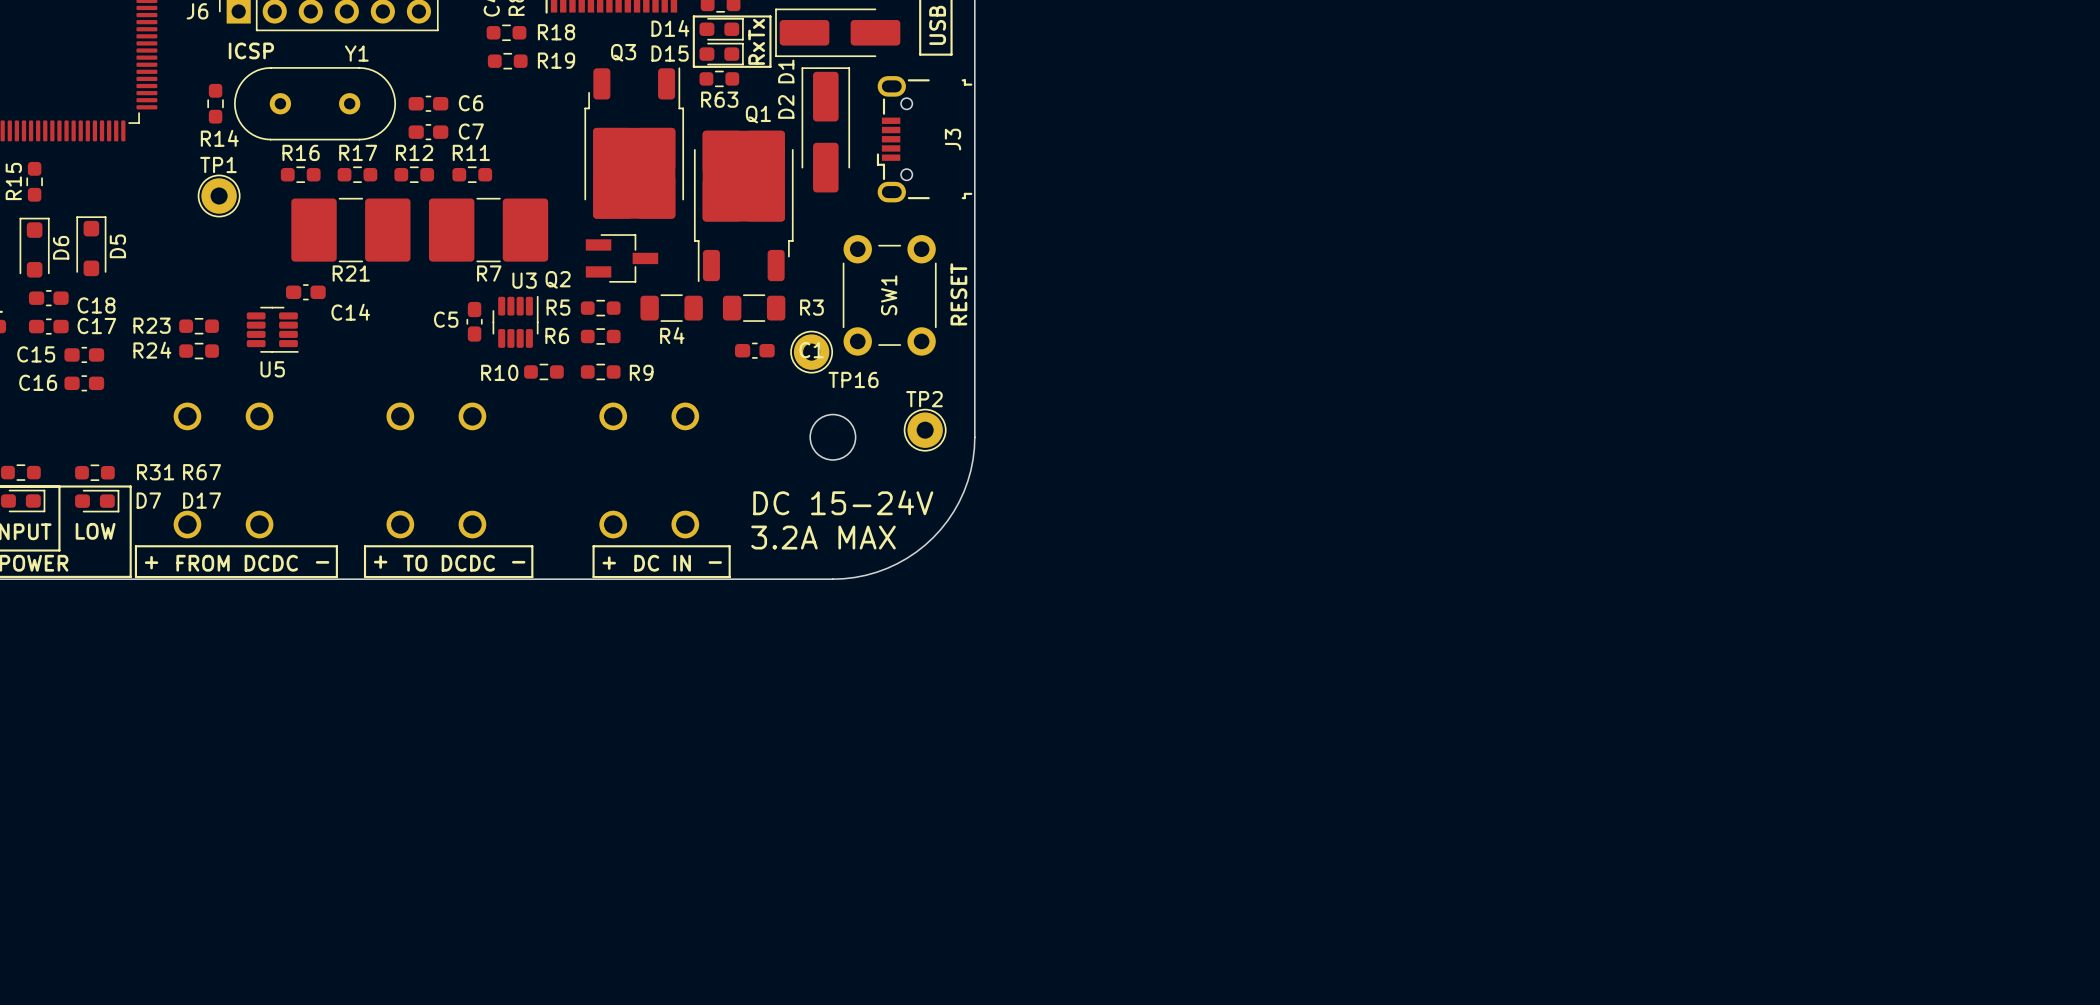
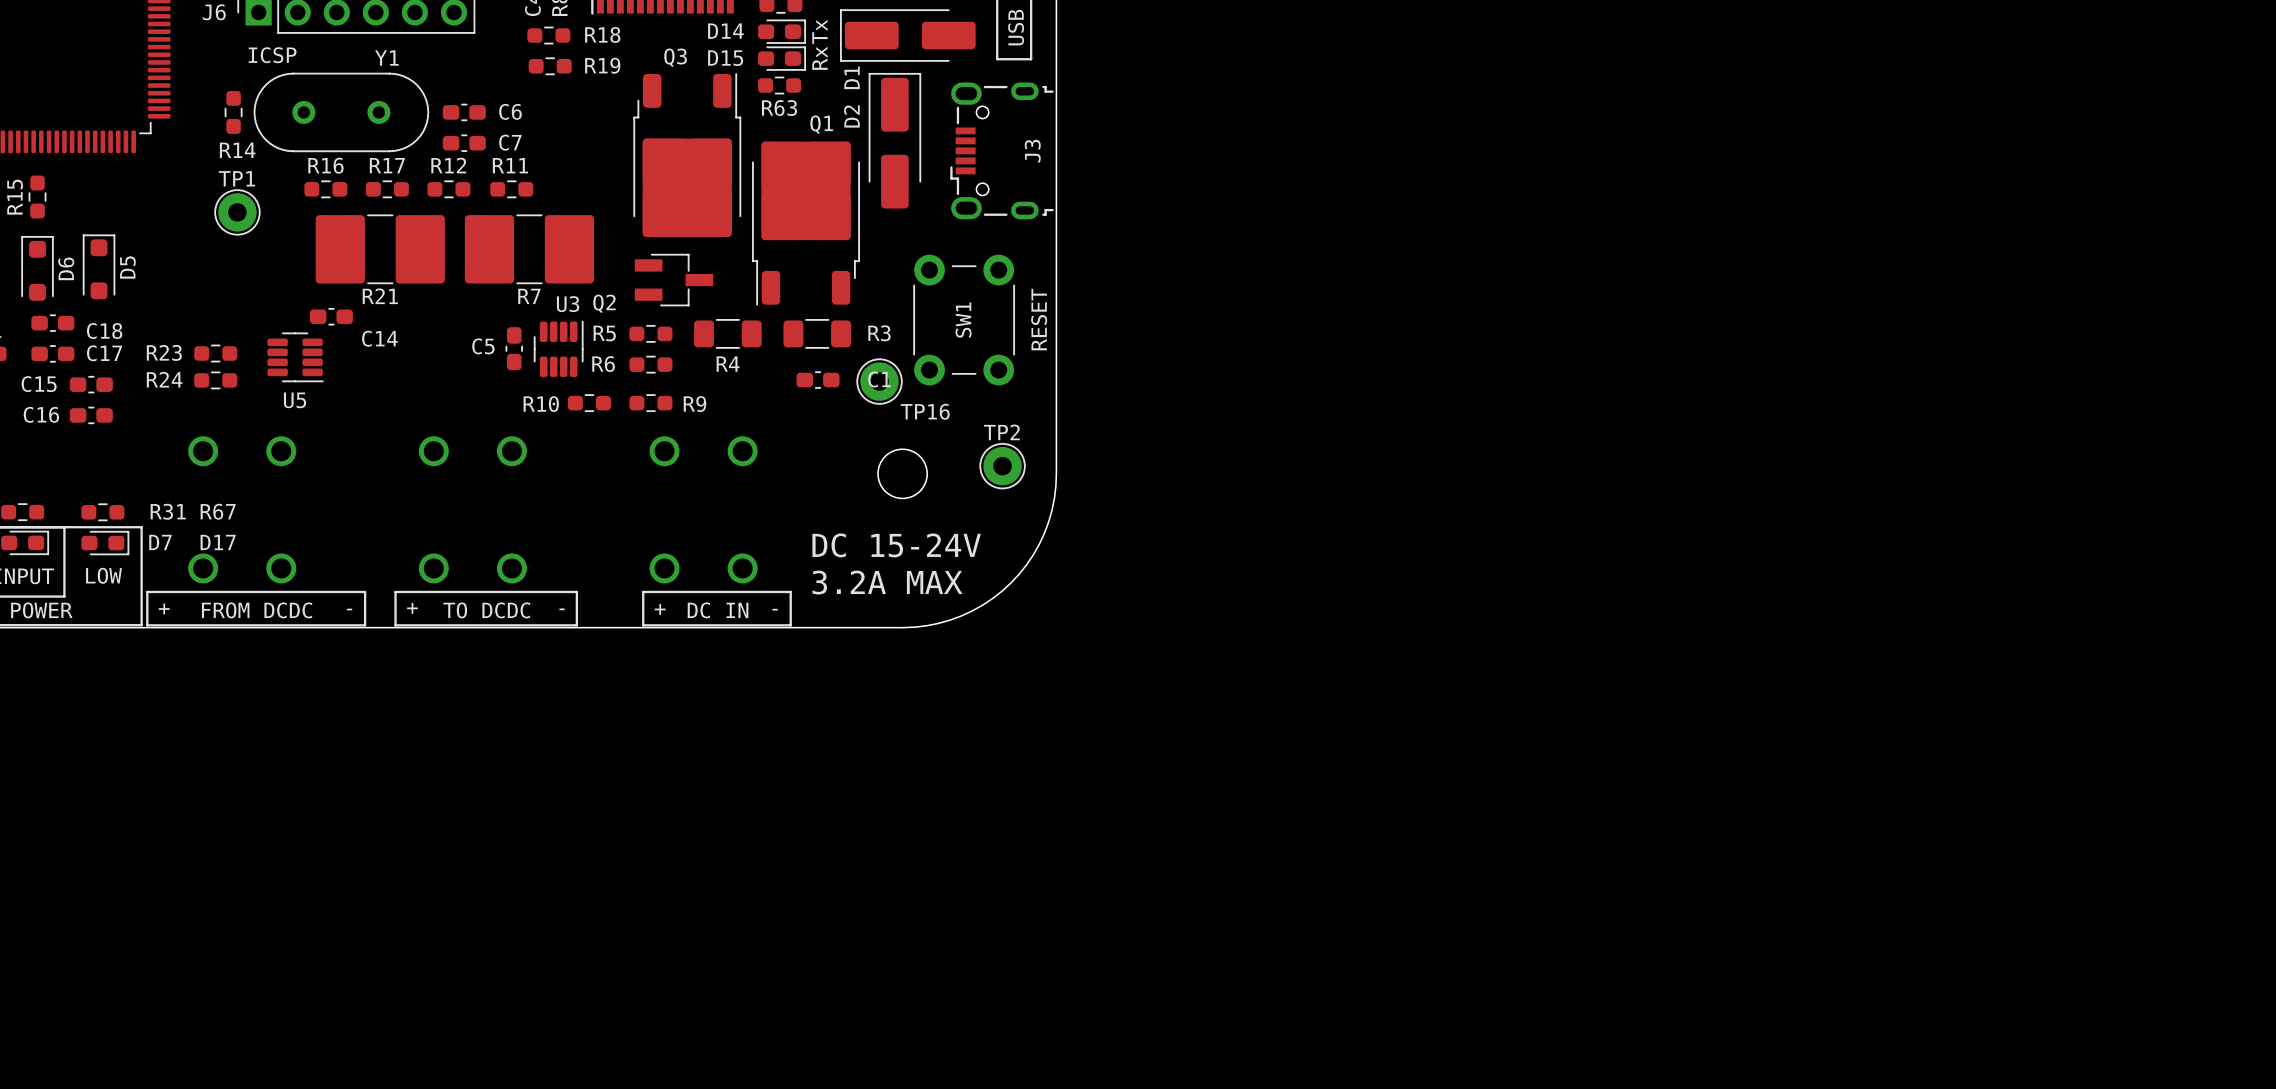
line: (693, 16) (770, 16) (770, 66) (693, 66) (693, 16) -> none
J3 footprint: [876, 76, 973, 203] -> [950, 82, 1054, 220]

